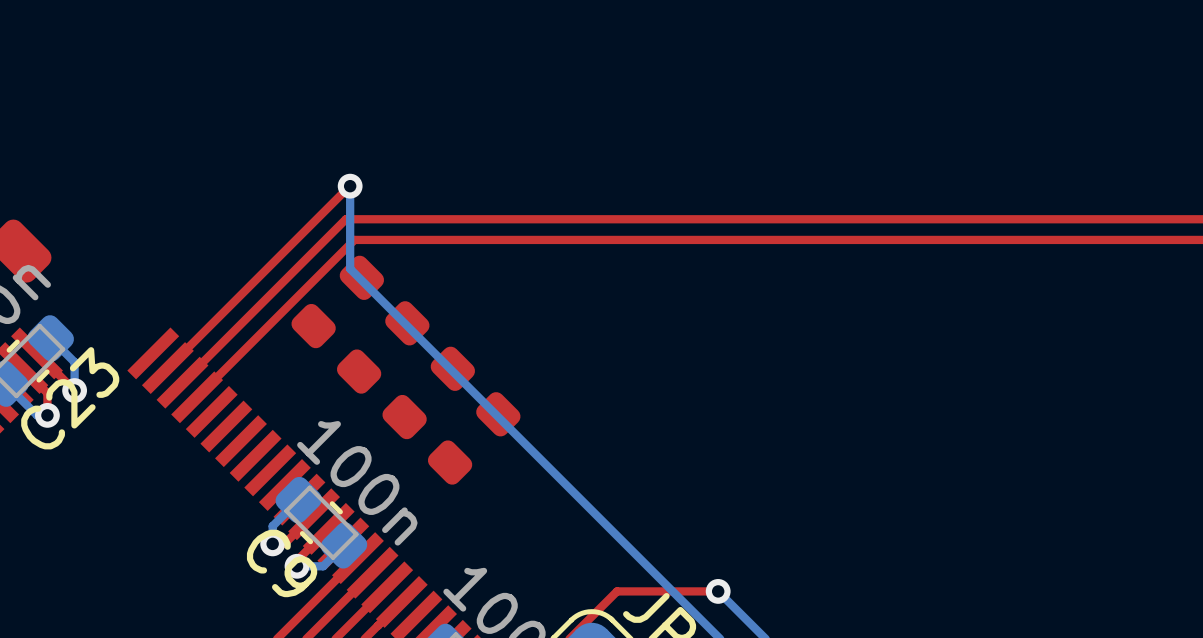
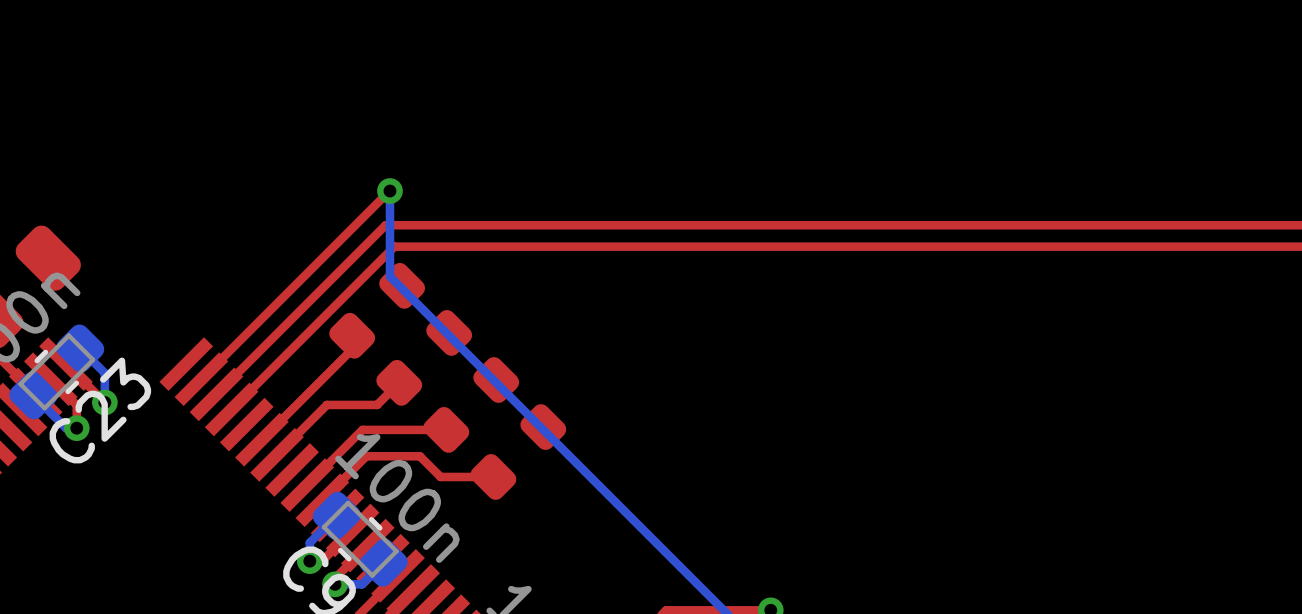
top track: none -> (352, 335) (352, 349) (261, 439)
top track: none -> (399, 382) (377, 404) (326, 404) (277, 454)
top track: none -> (446, 429) (362, 429) (307, 485)
top track: none -> (493, 476) (440, 476) (419, 456) (366, 456) (322, 500)

